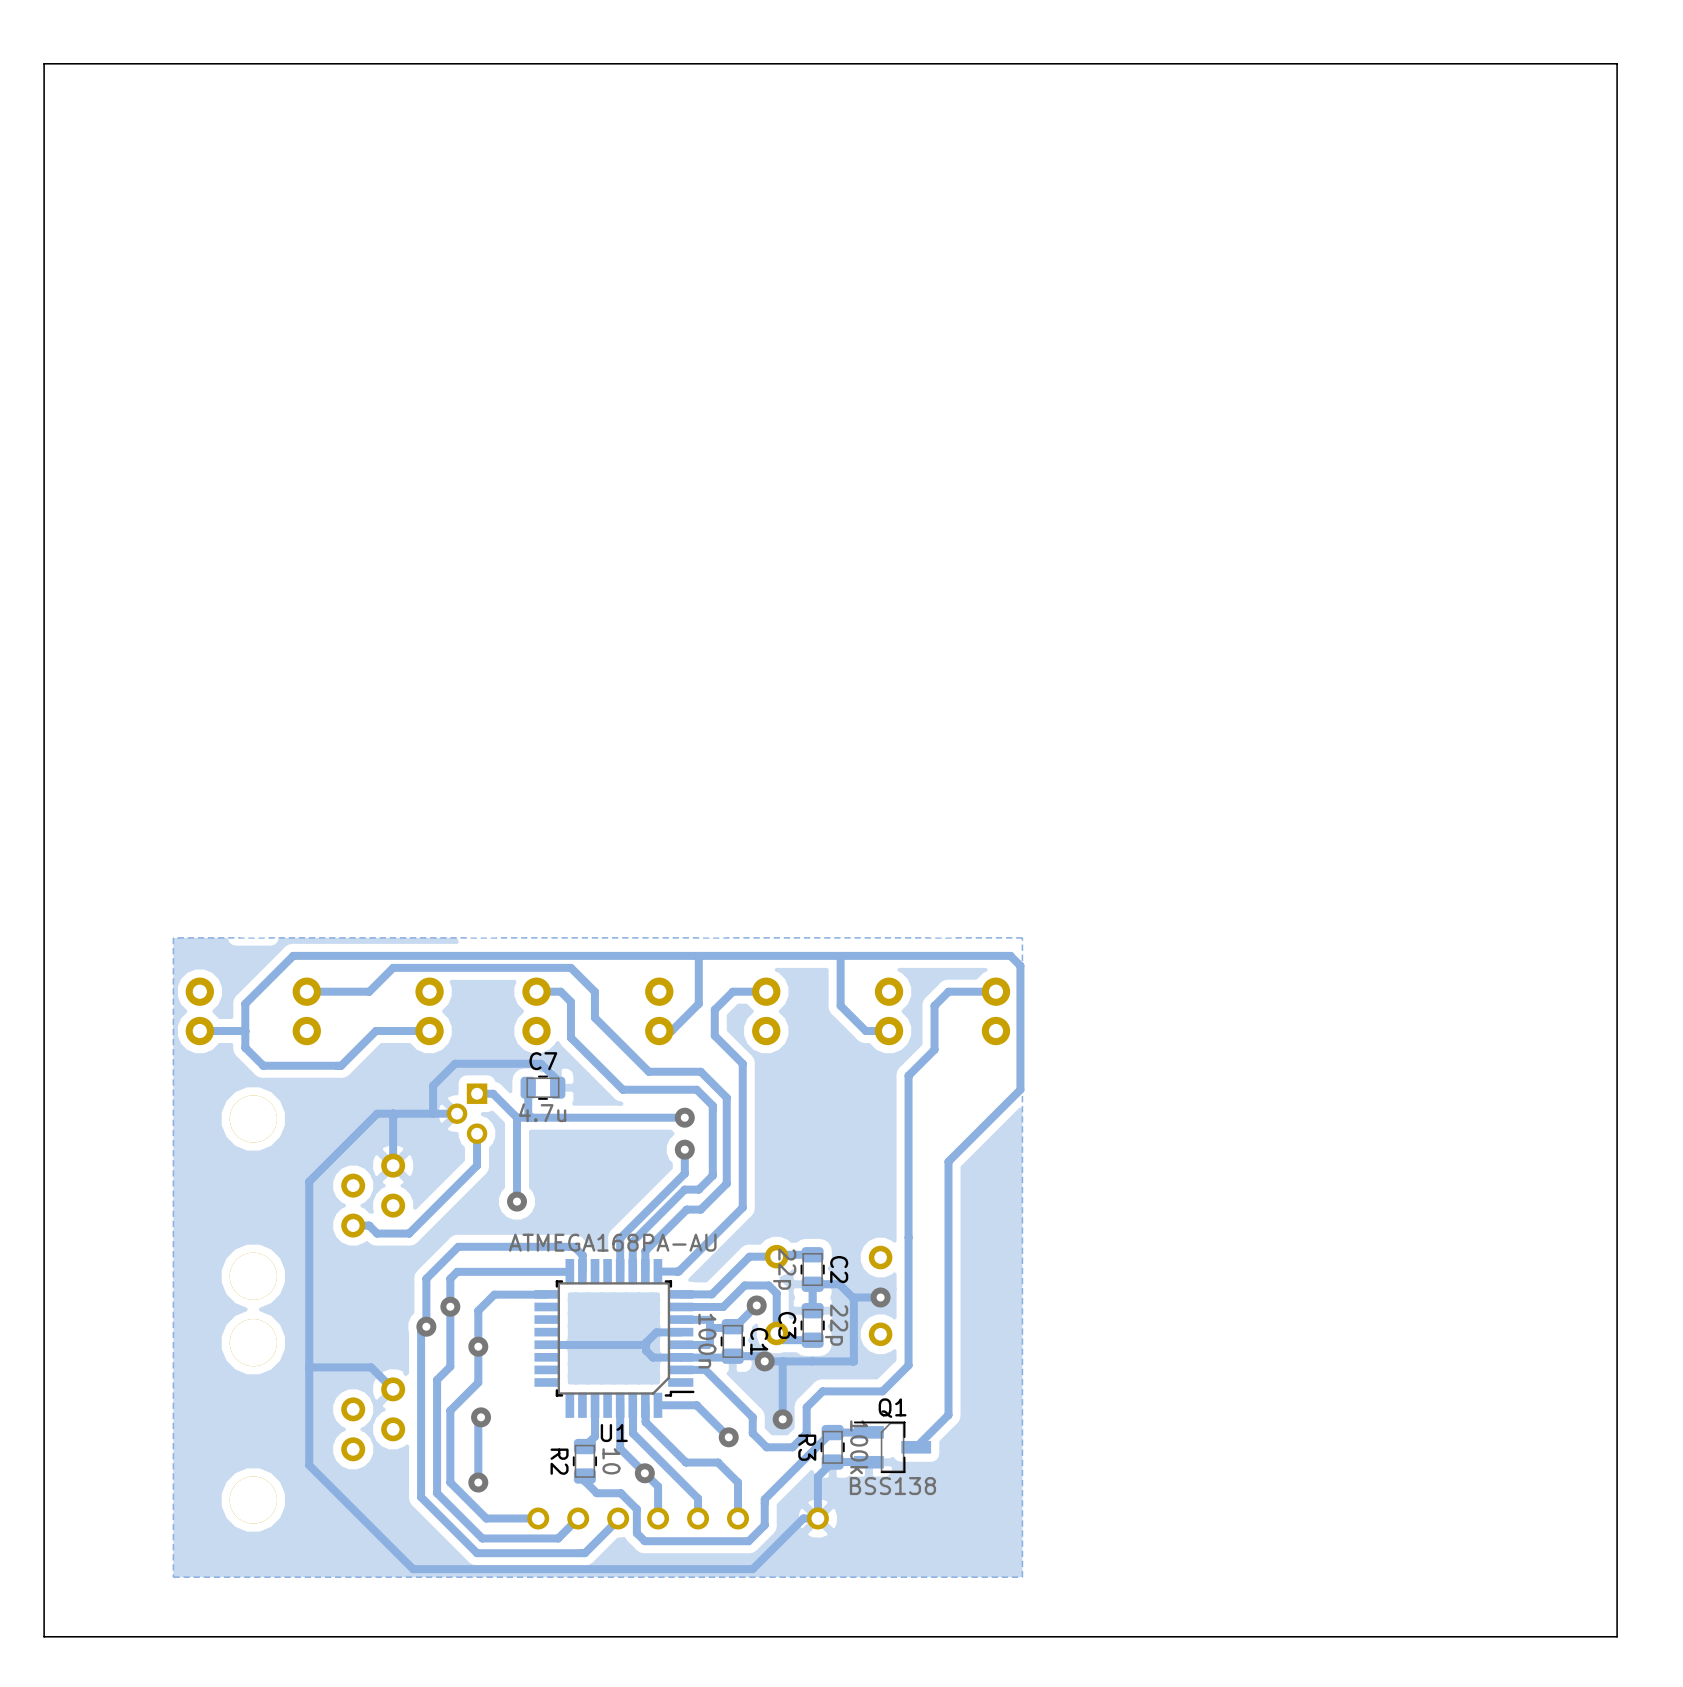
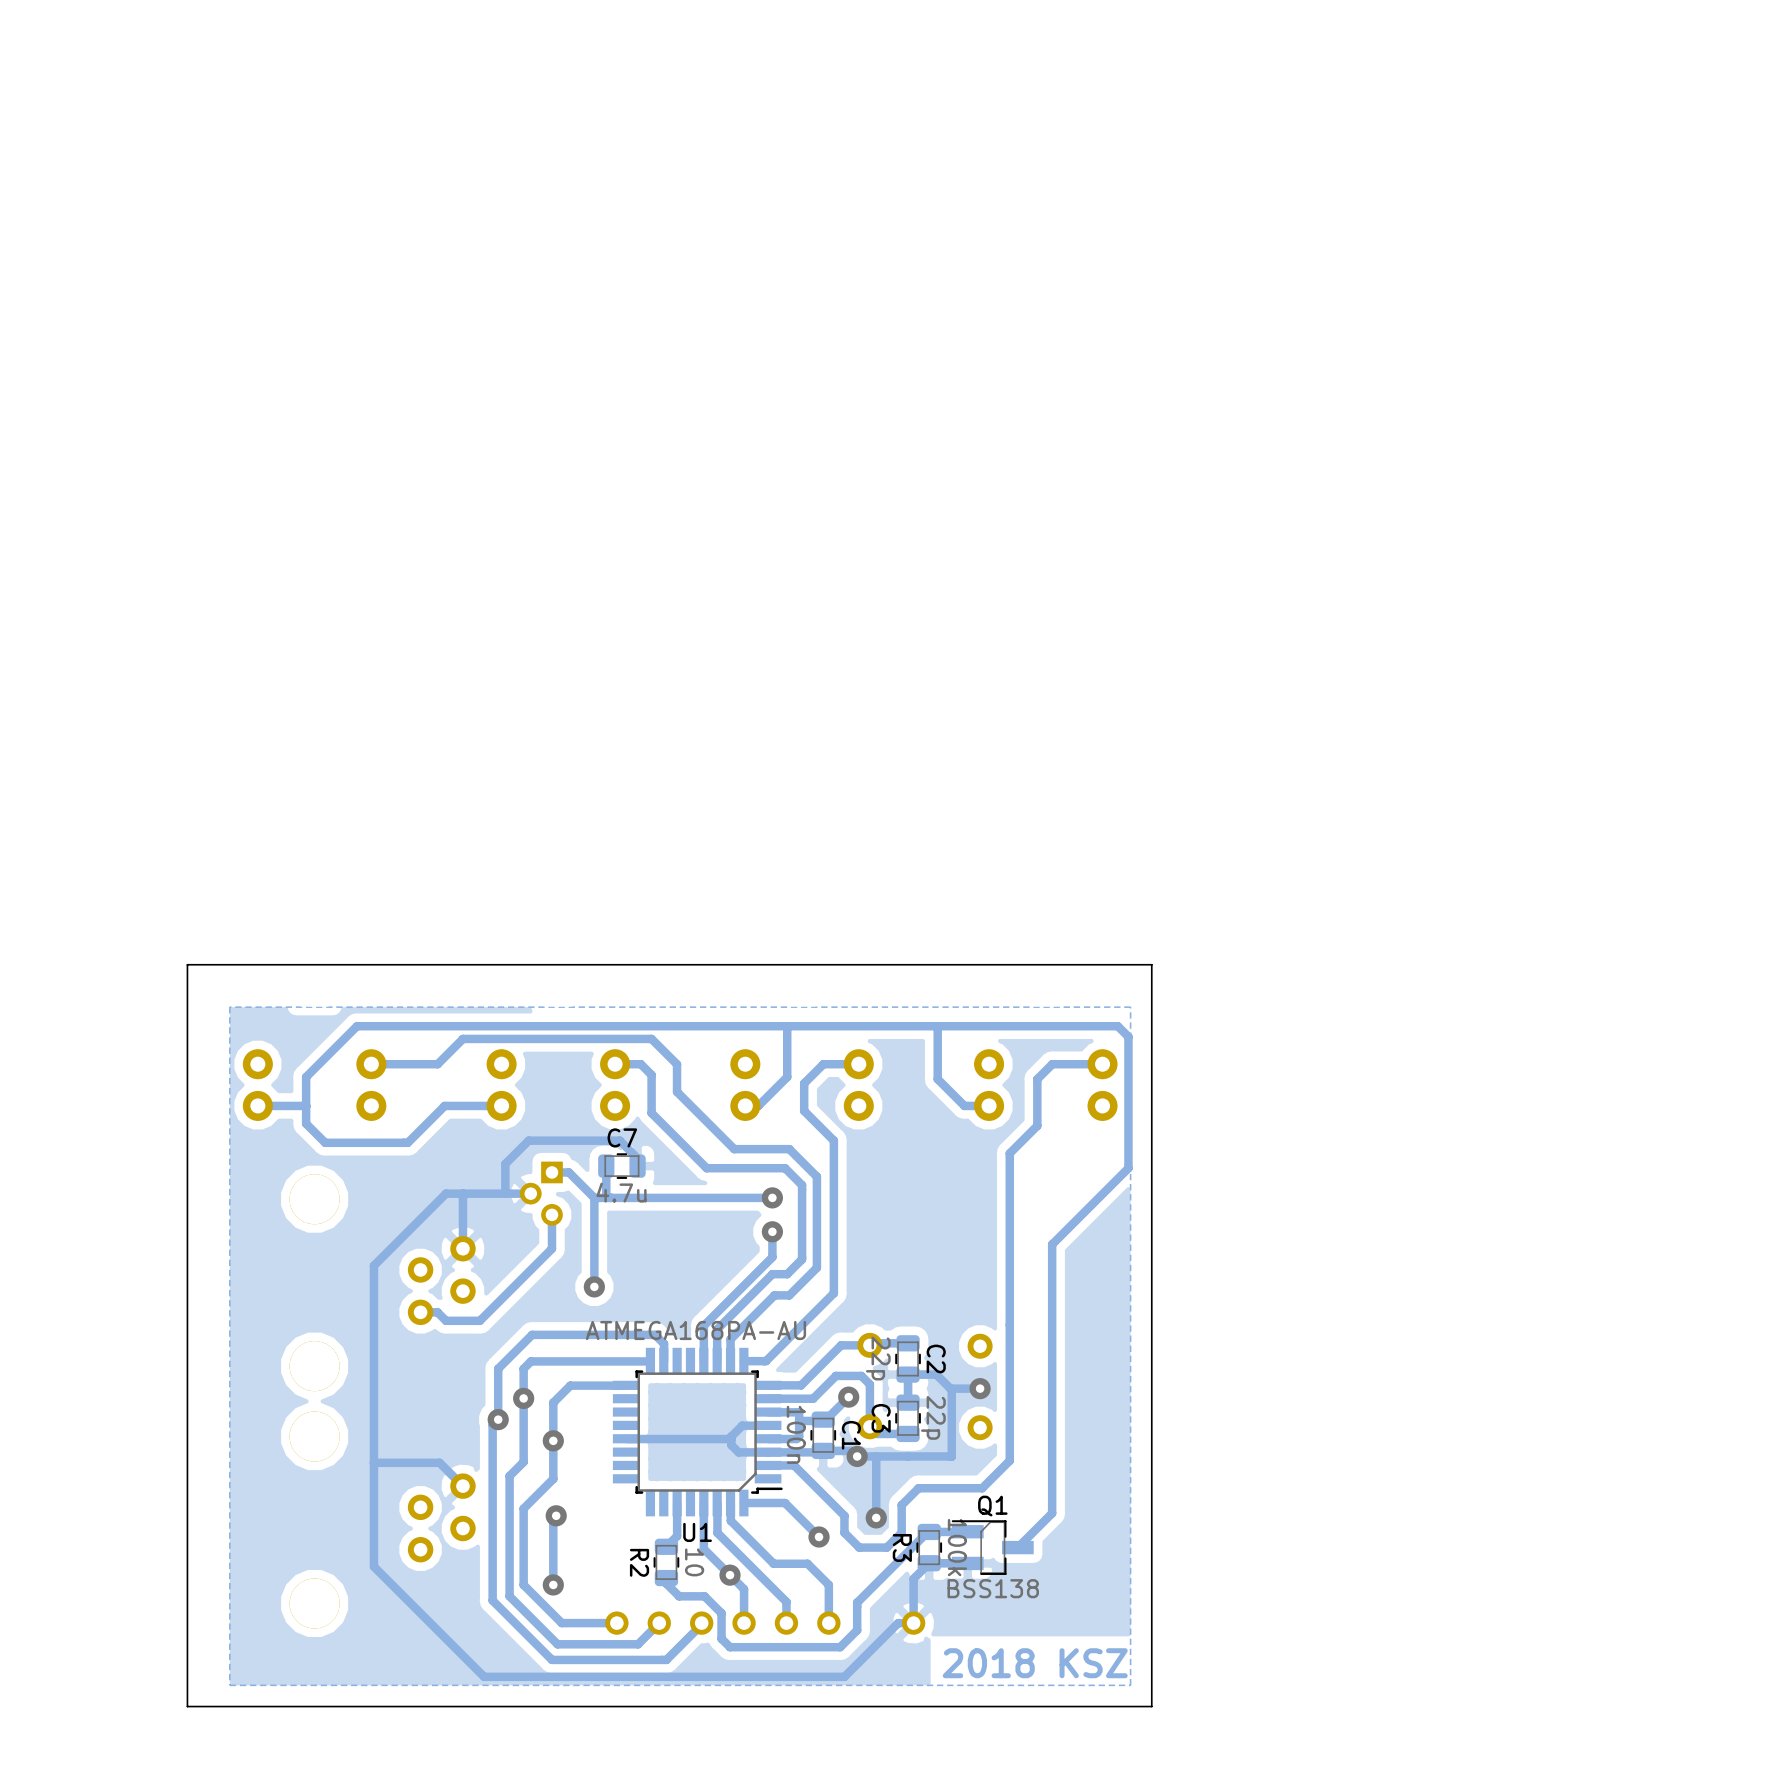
board edge: (1617, 63) (1617, 1636) (44, 1636) (44, 63) (1617, 63) -> none
board edge: none -> (1151, 964) (1151, 1706) (187, 1706) (187, 964) (1151, 964)
text: none -> 2018 KSZ (1035, 1663)

